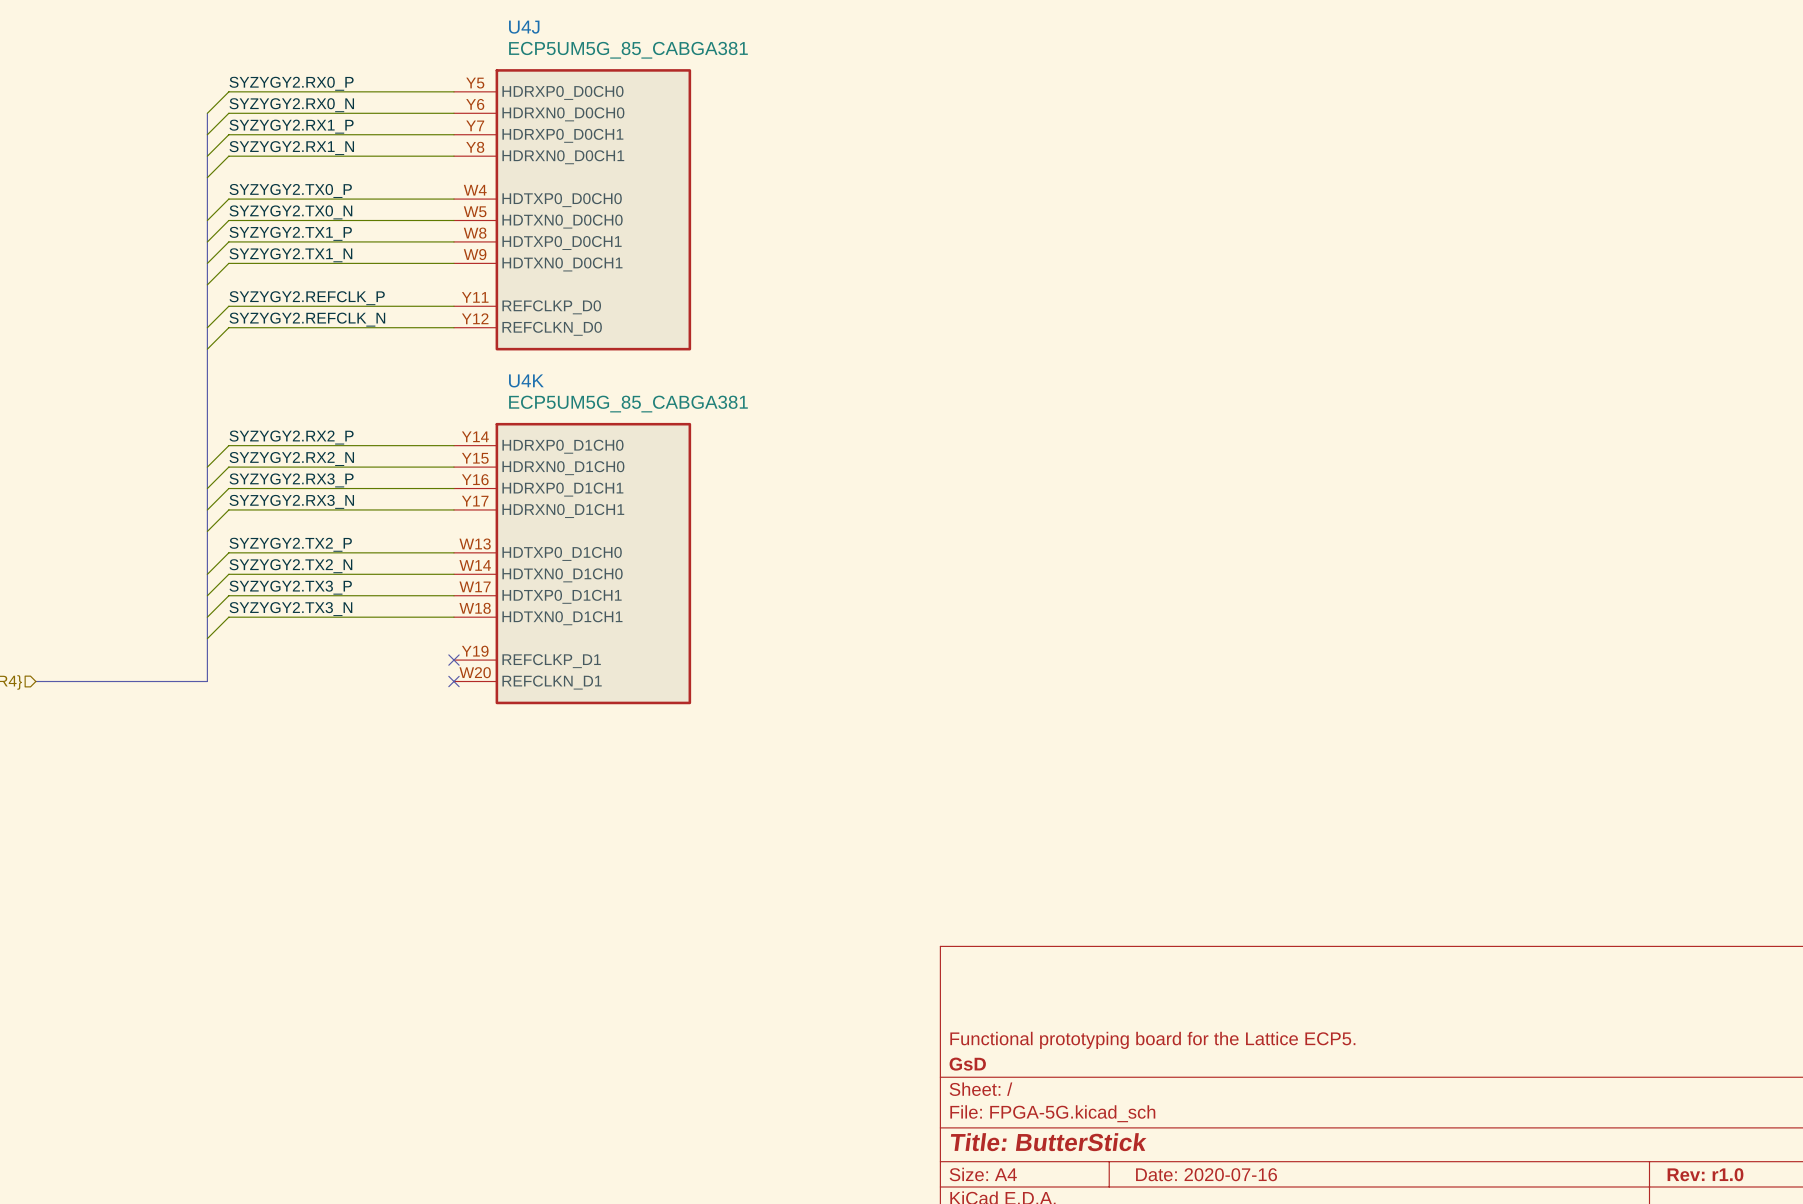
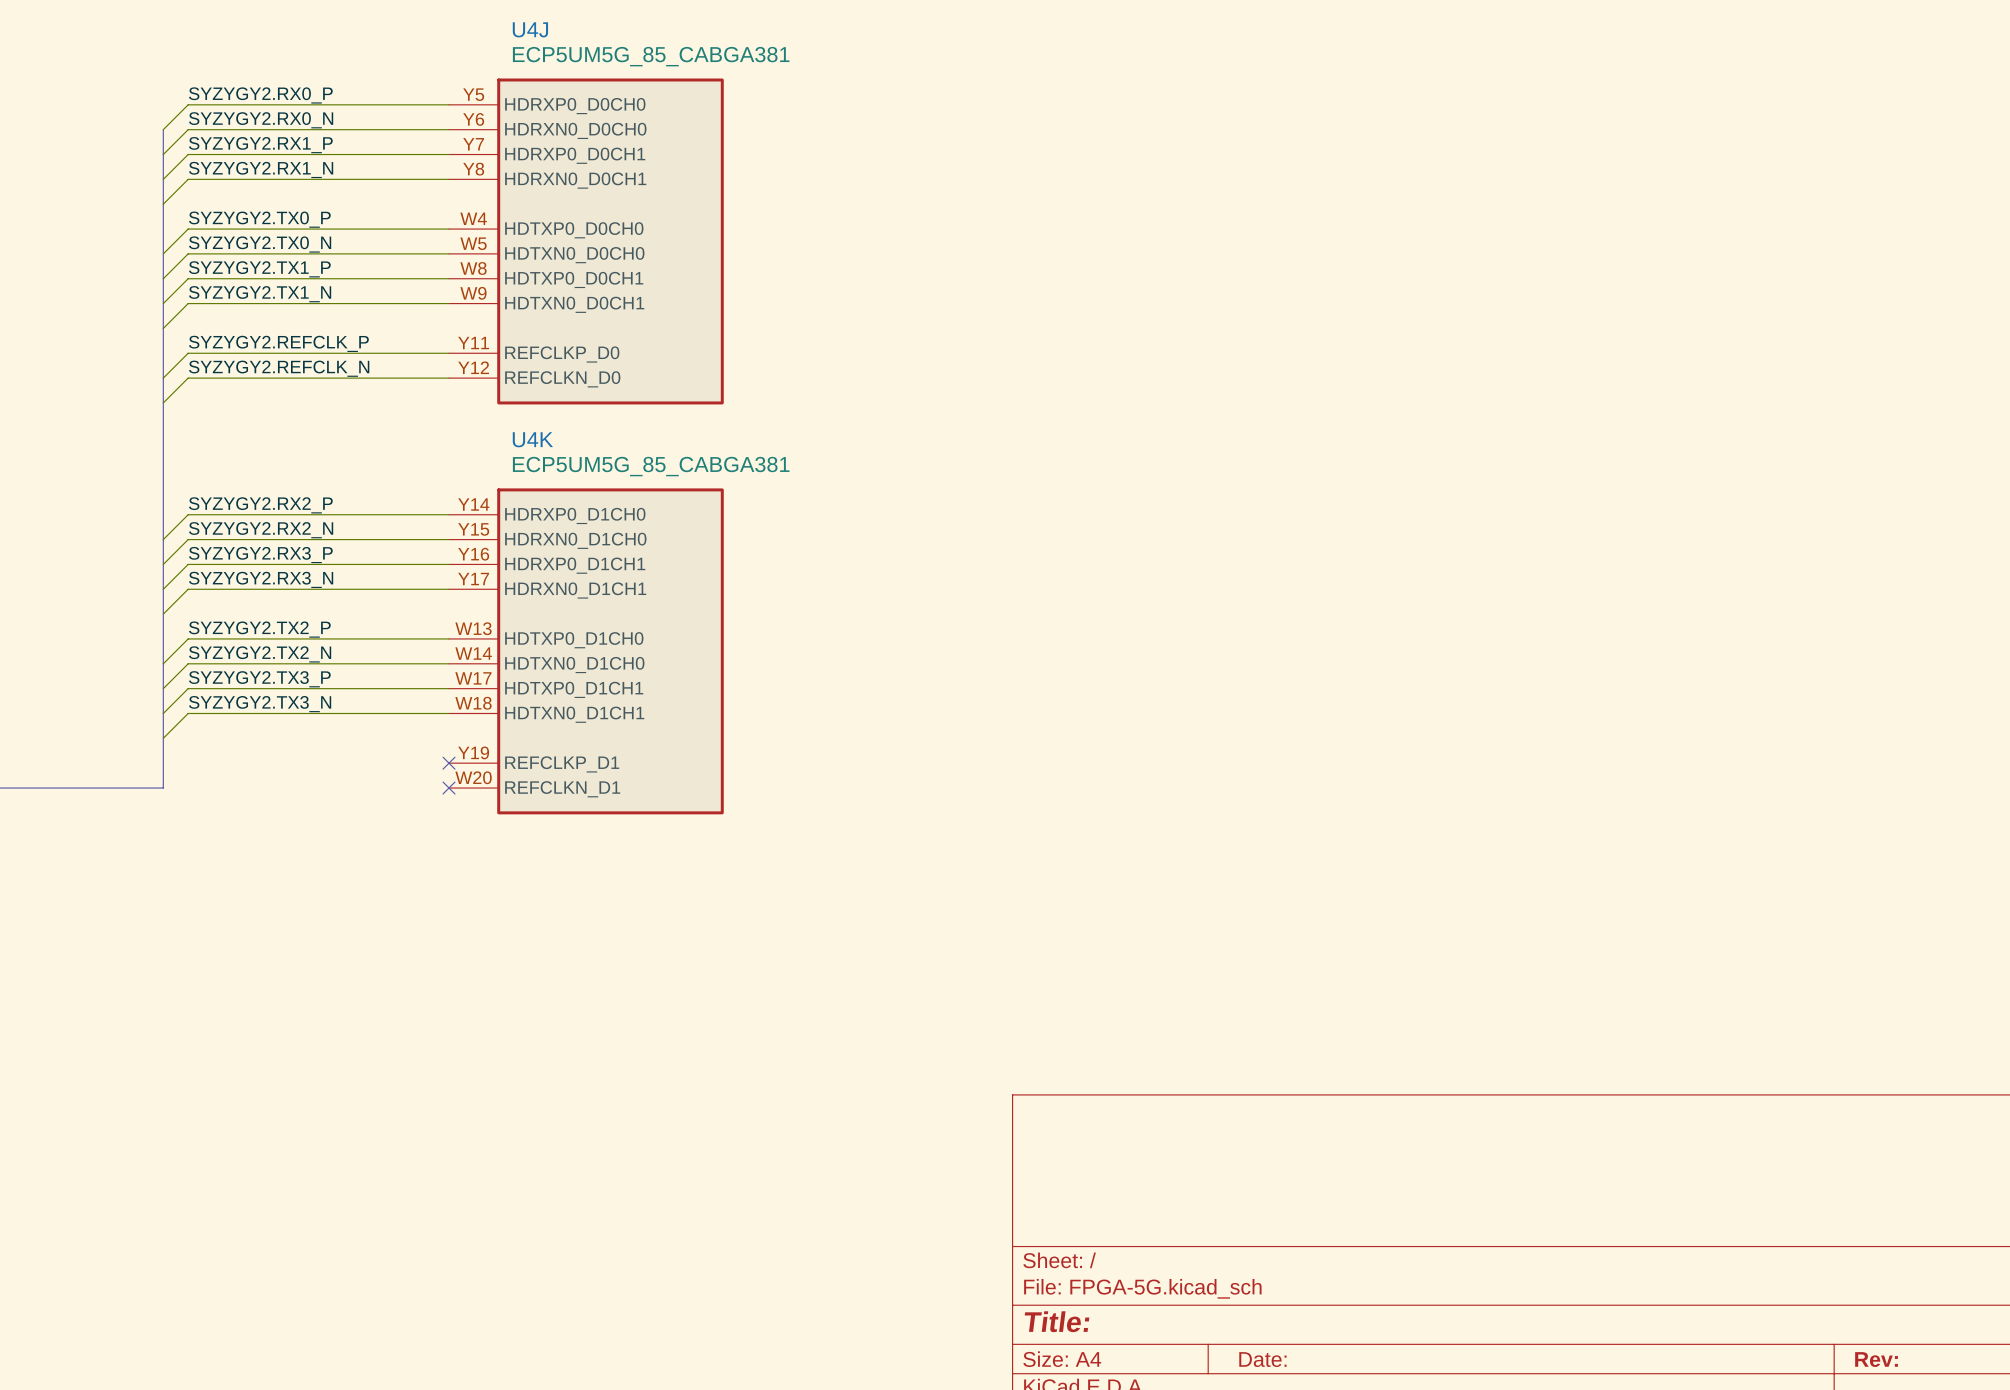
title block: Functional prototyping board for the Lattice ECP5. (1152, 1040) -> none
title block: GsD (967, 1064) -> none
title block: Title: ButterStick (1048, 1142) -> Title: (1057, 1321)
title block: Date: 2020-07-16 (1206, 1174) -> Date: (1262, 1359)
title block: Rev: r1.0 (1705, 1174) -> Rev: (1876, 1359)

